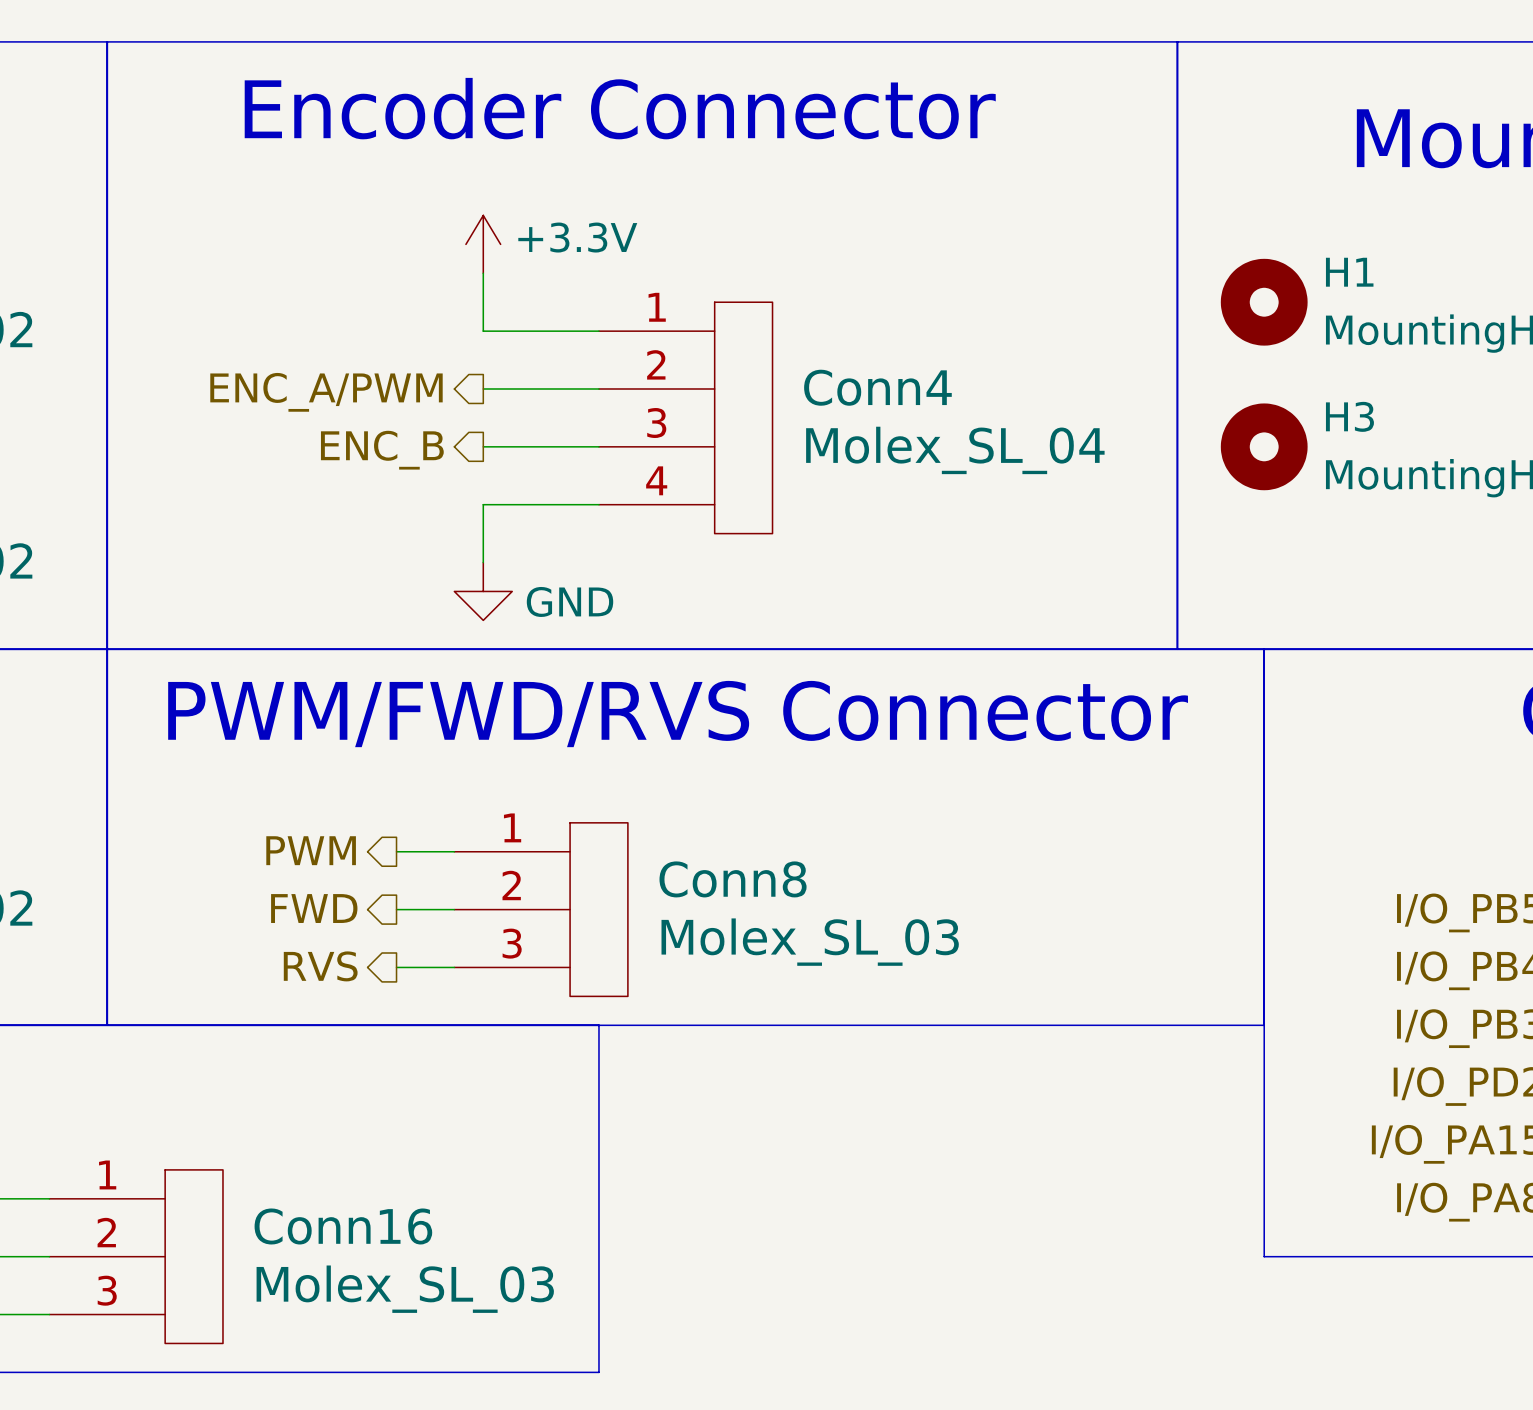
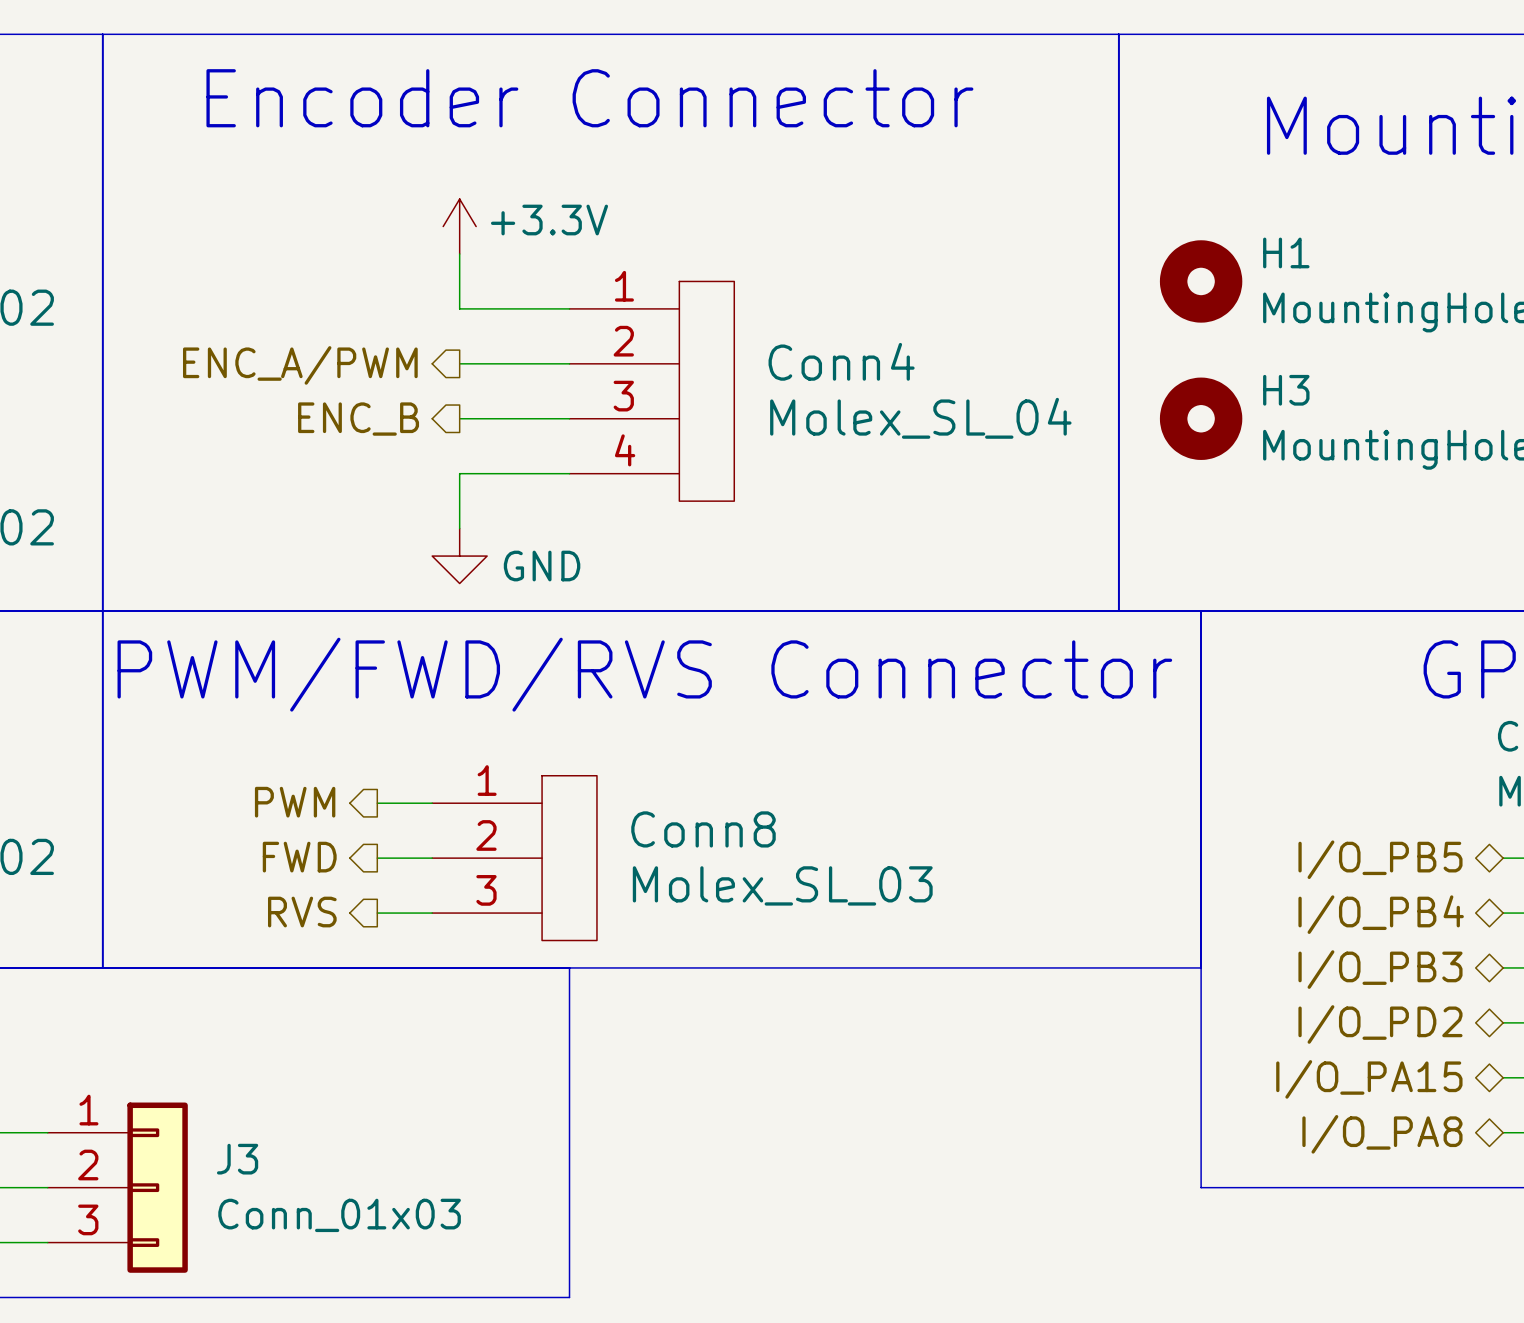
J3: none -> Conn_01x03 (117, 1187)
Conn16: Molex_SL_03 (136, 1256) -> none

